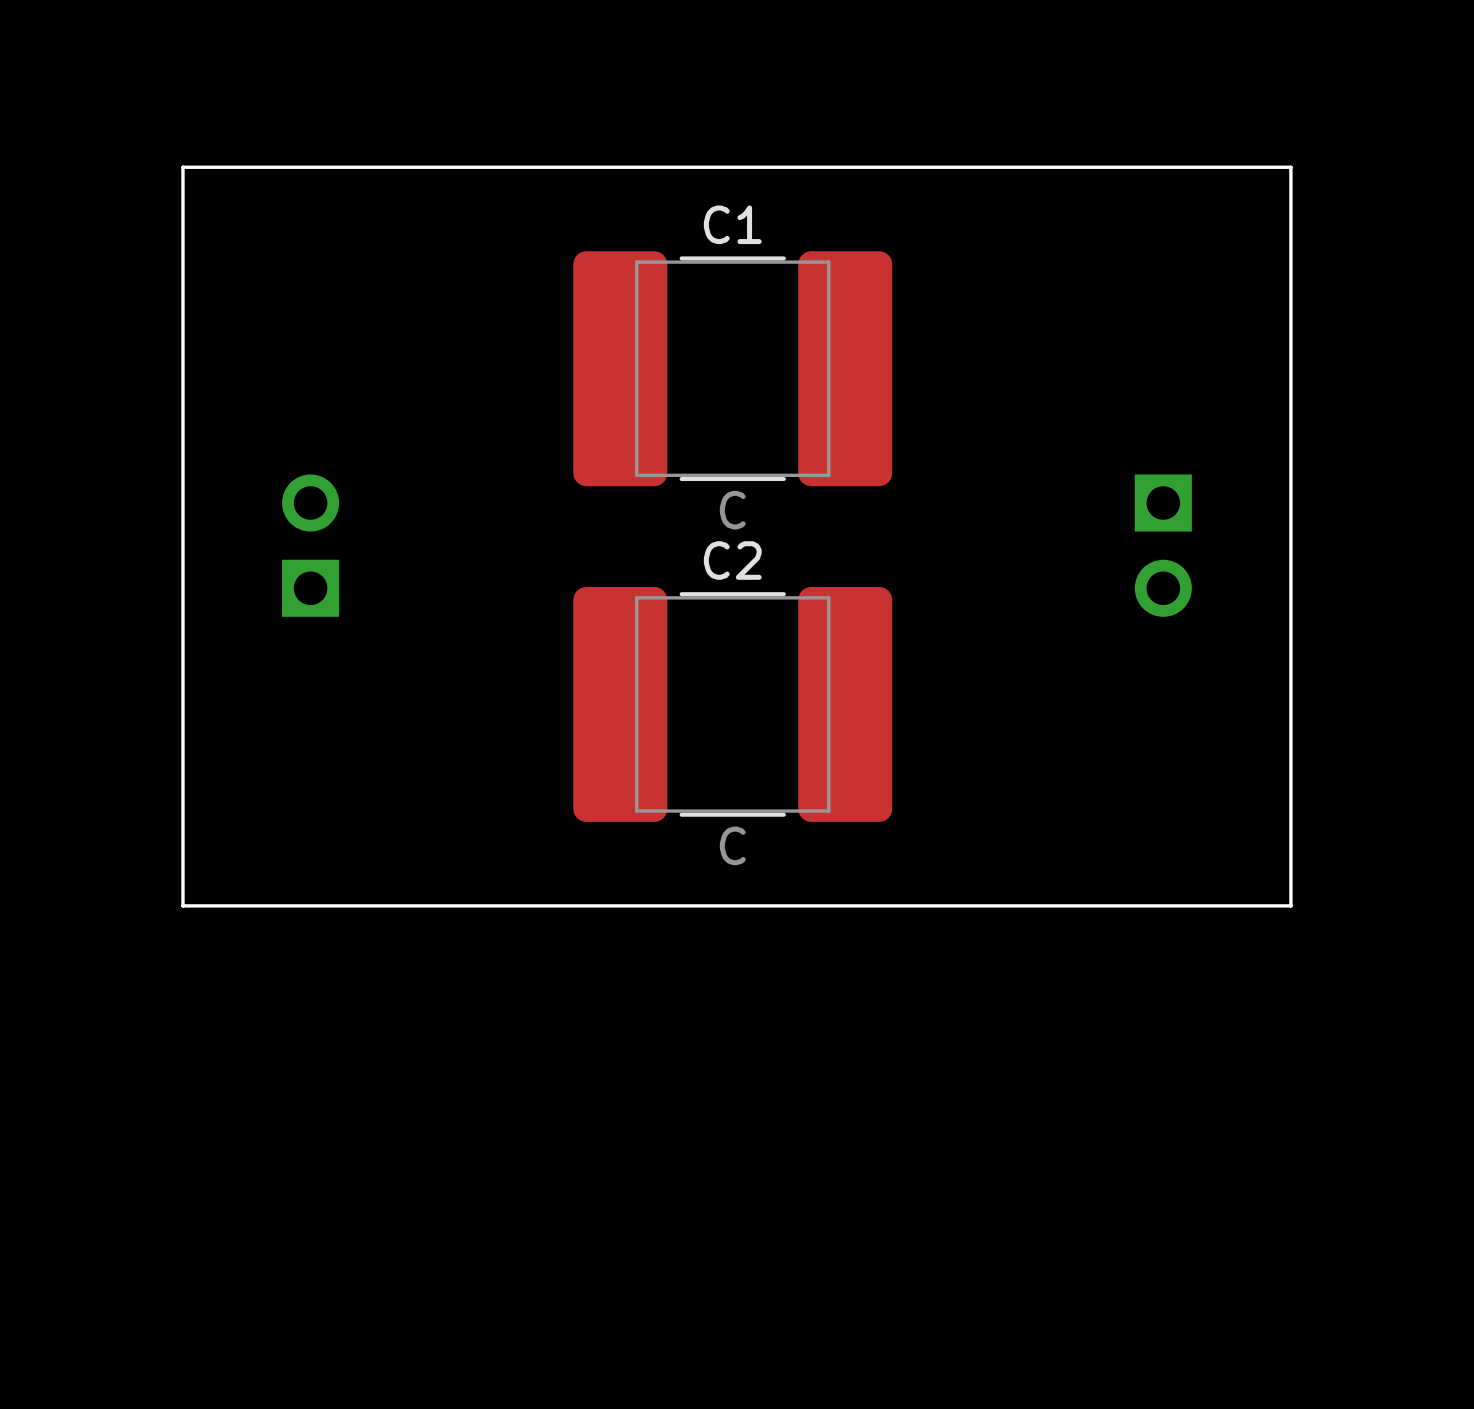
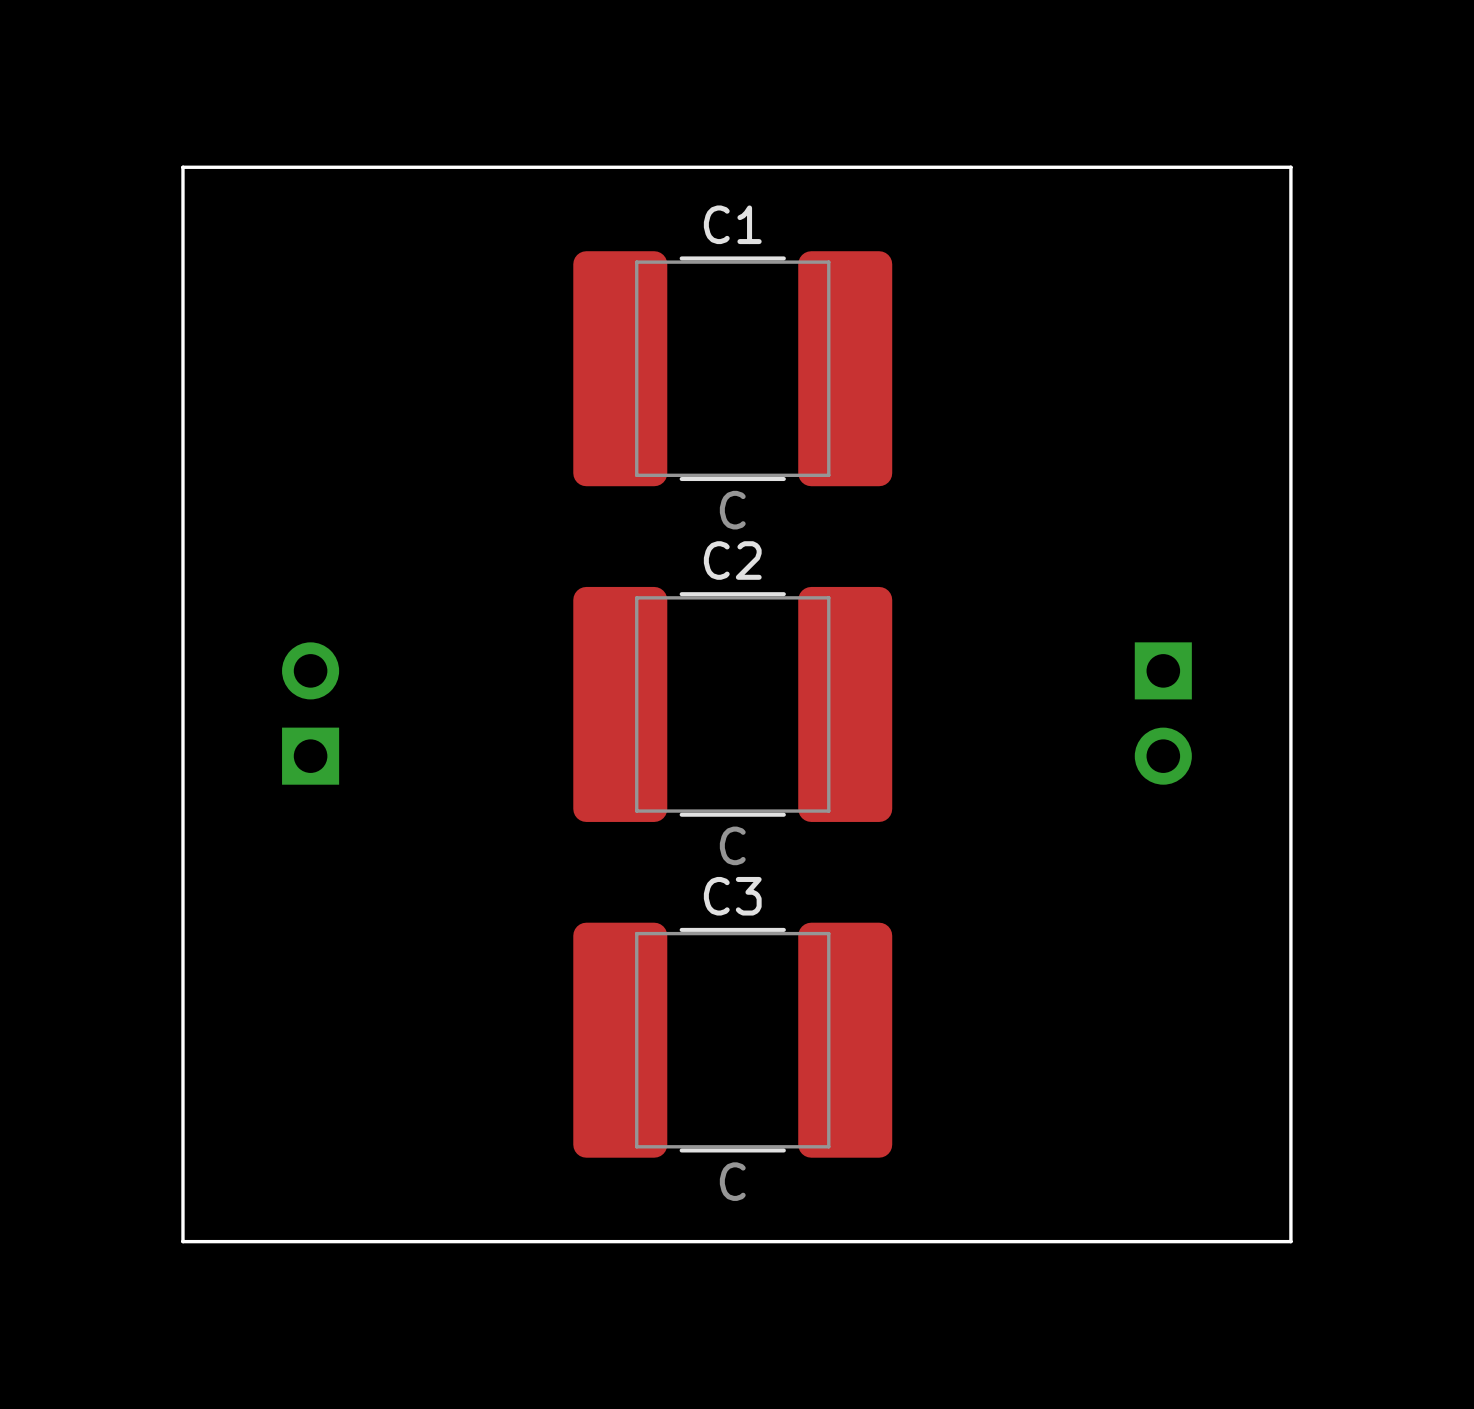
part position: (310, 545) -> (310, 713)
part position: (1163, 545) -> (1163, 713)
board edge: (182, 905) (1290, 905) -> (182, 905) (182, 1241) (1290, 1241) (1290, 905)
C3: none -> C (732, 1040)

